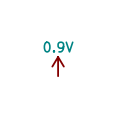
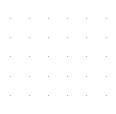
power symbol: 0.9V (58, 66) -> none

